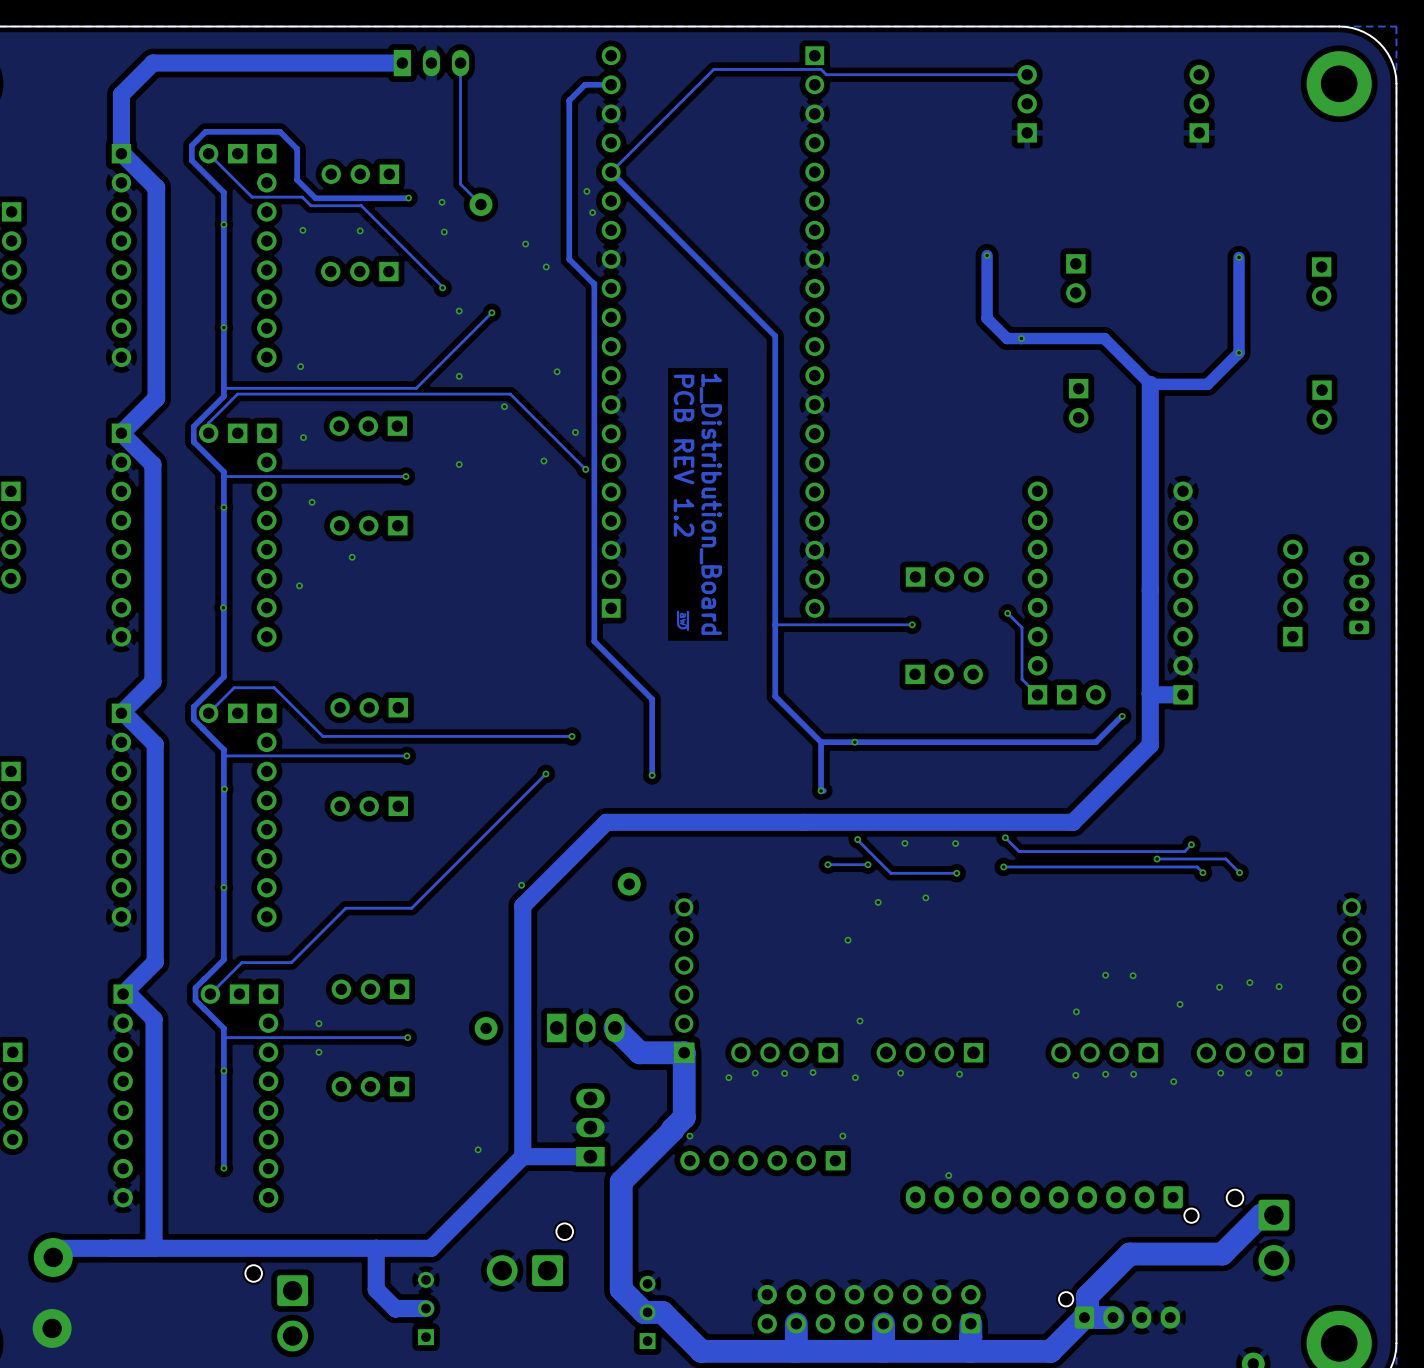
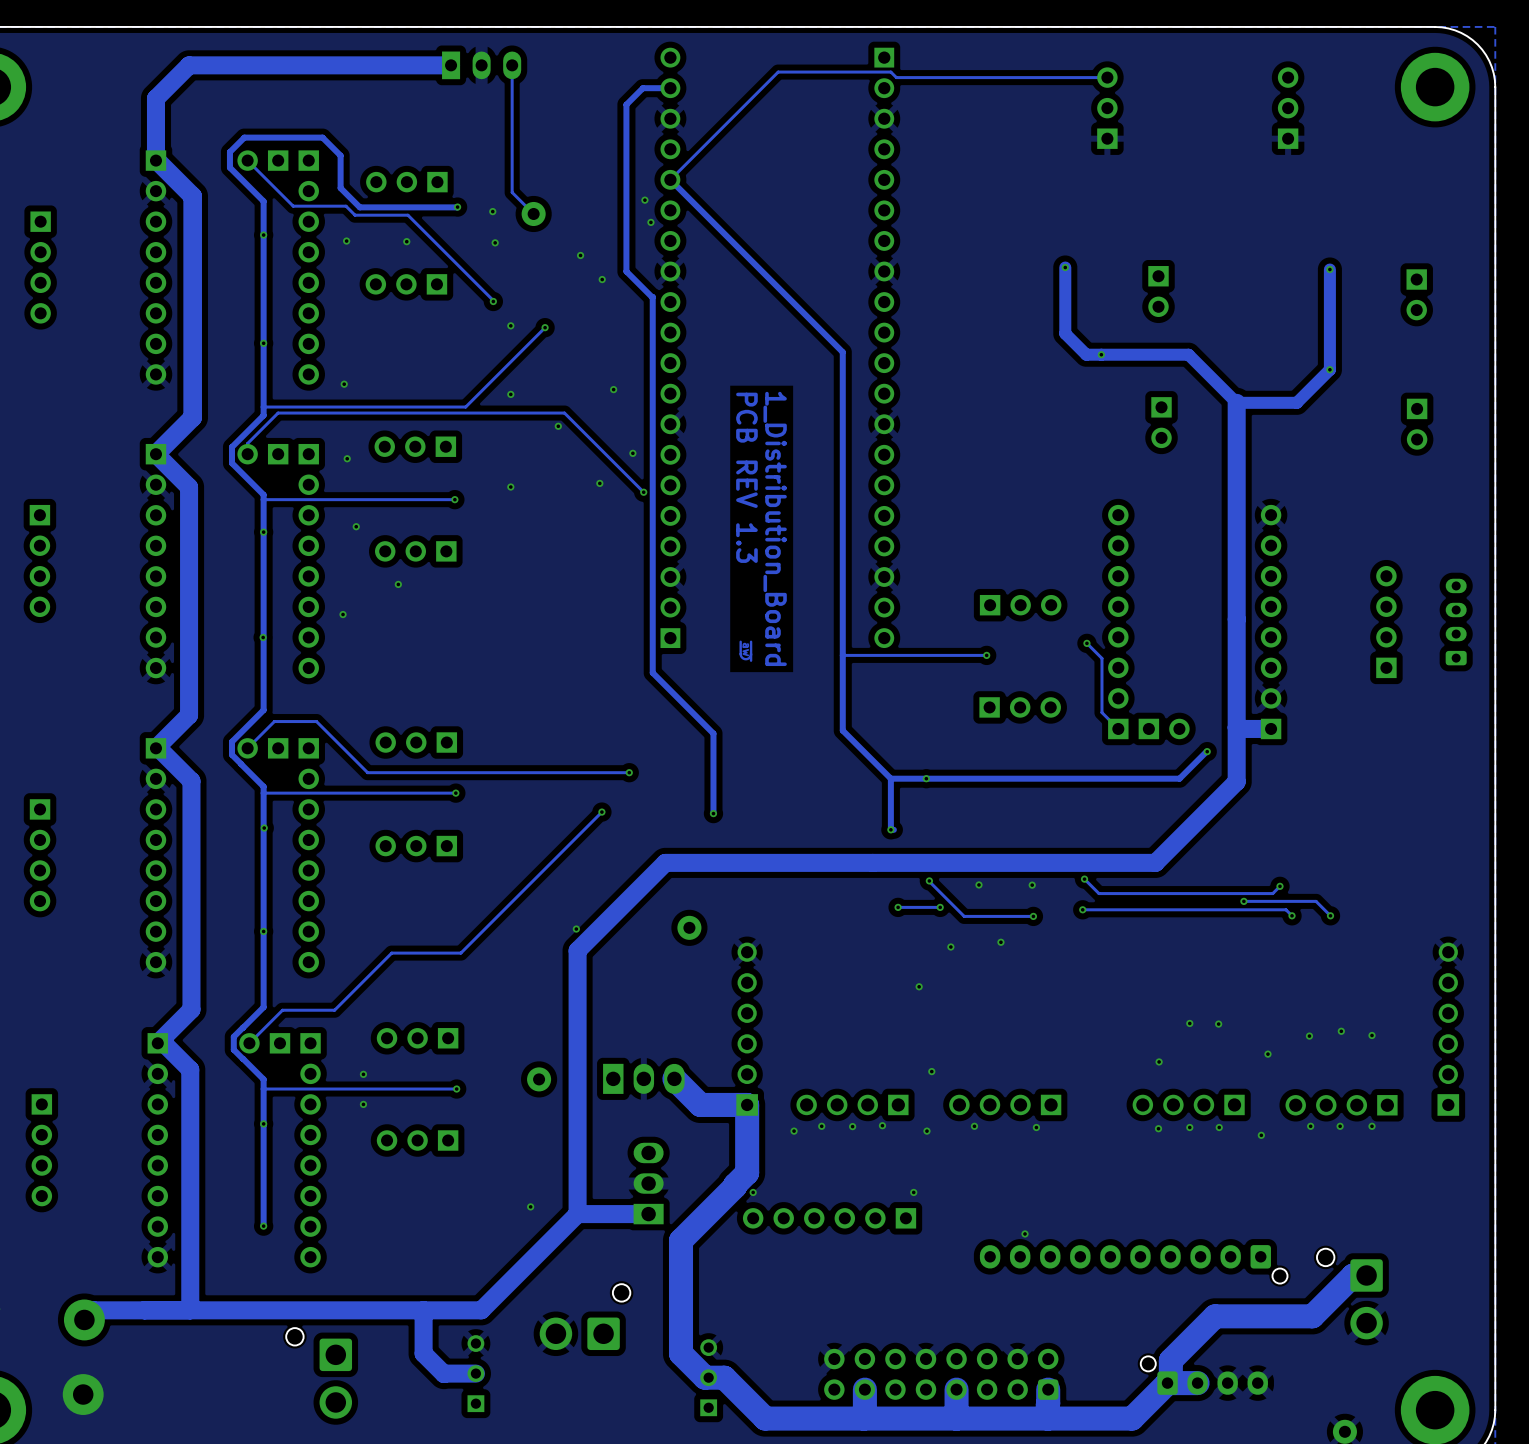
text: PCB REV 1.2 (684, 455) -> PCB REV 1.3 (746, 477)

